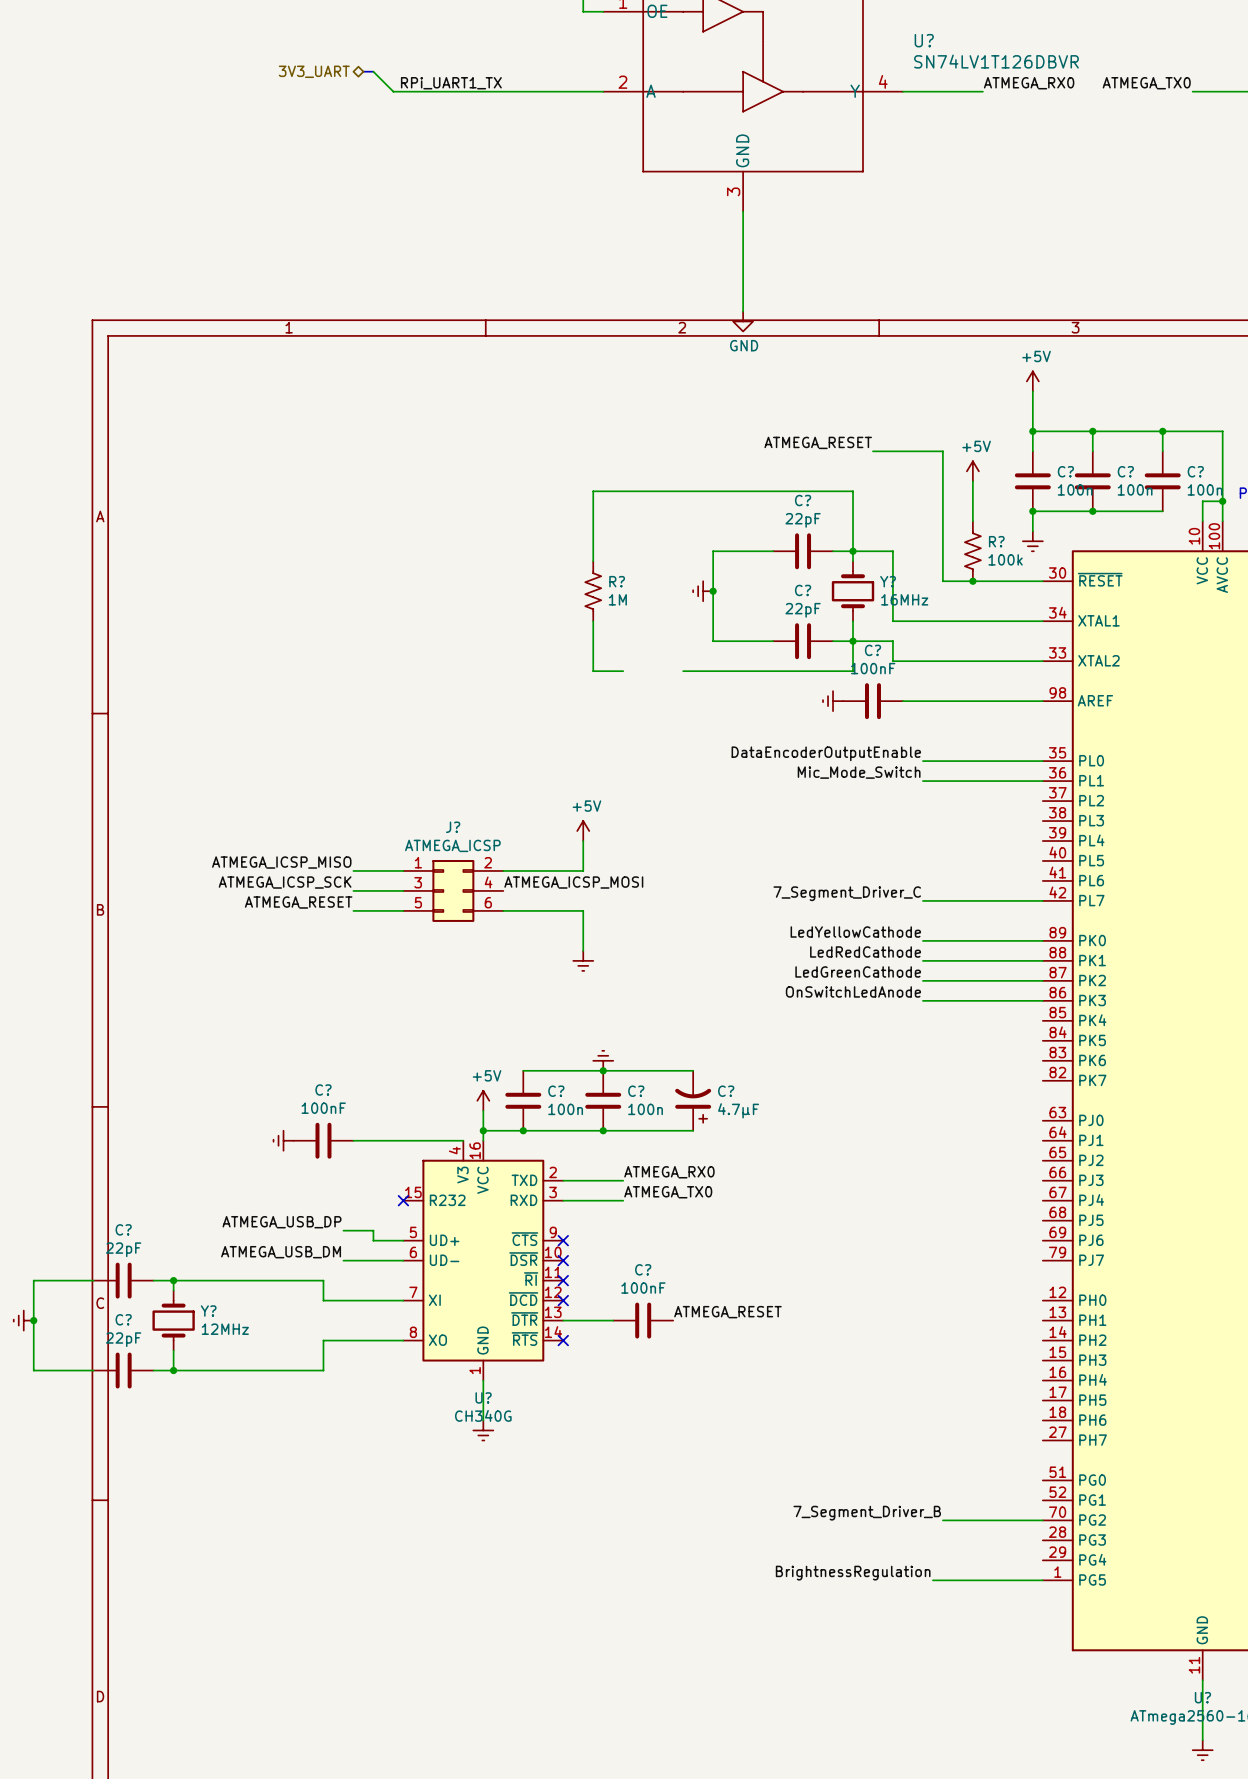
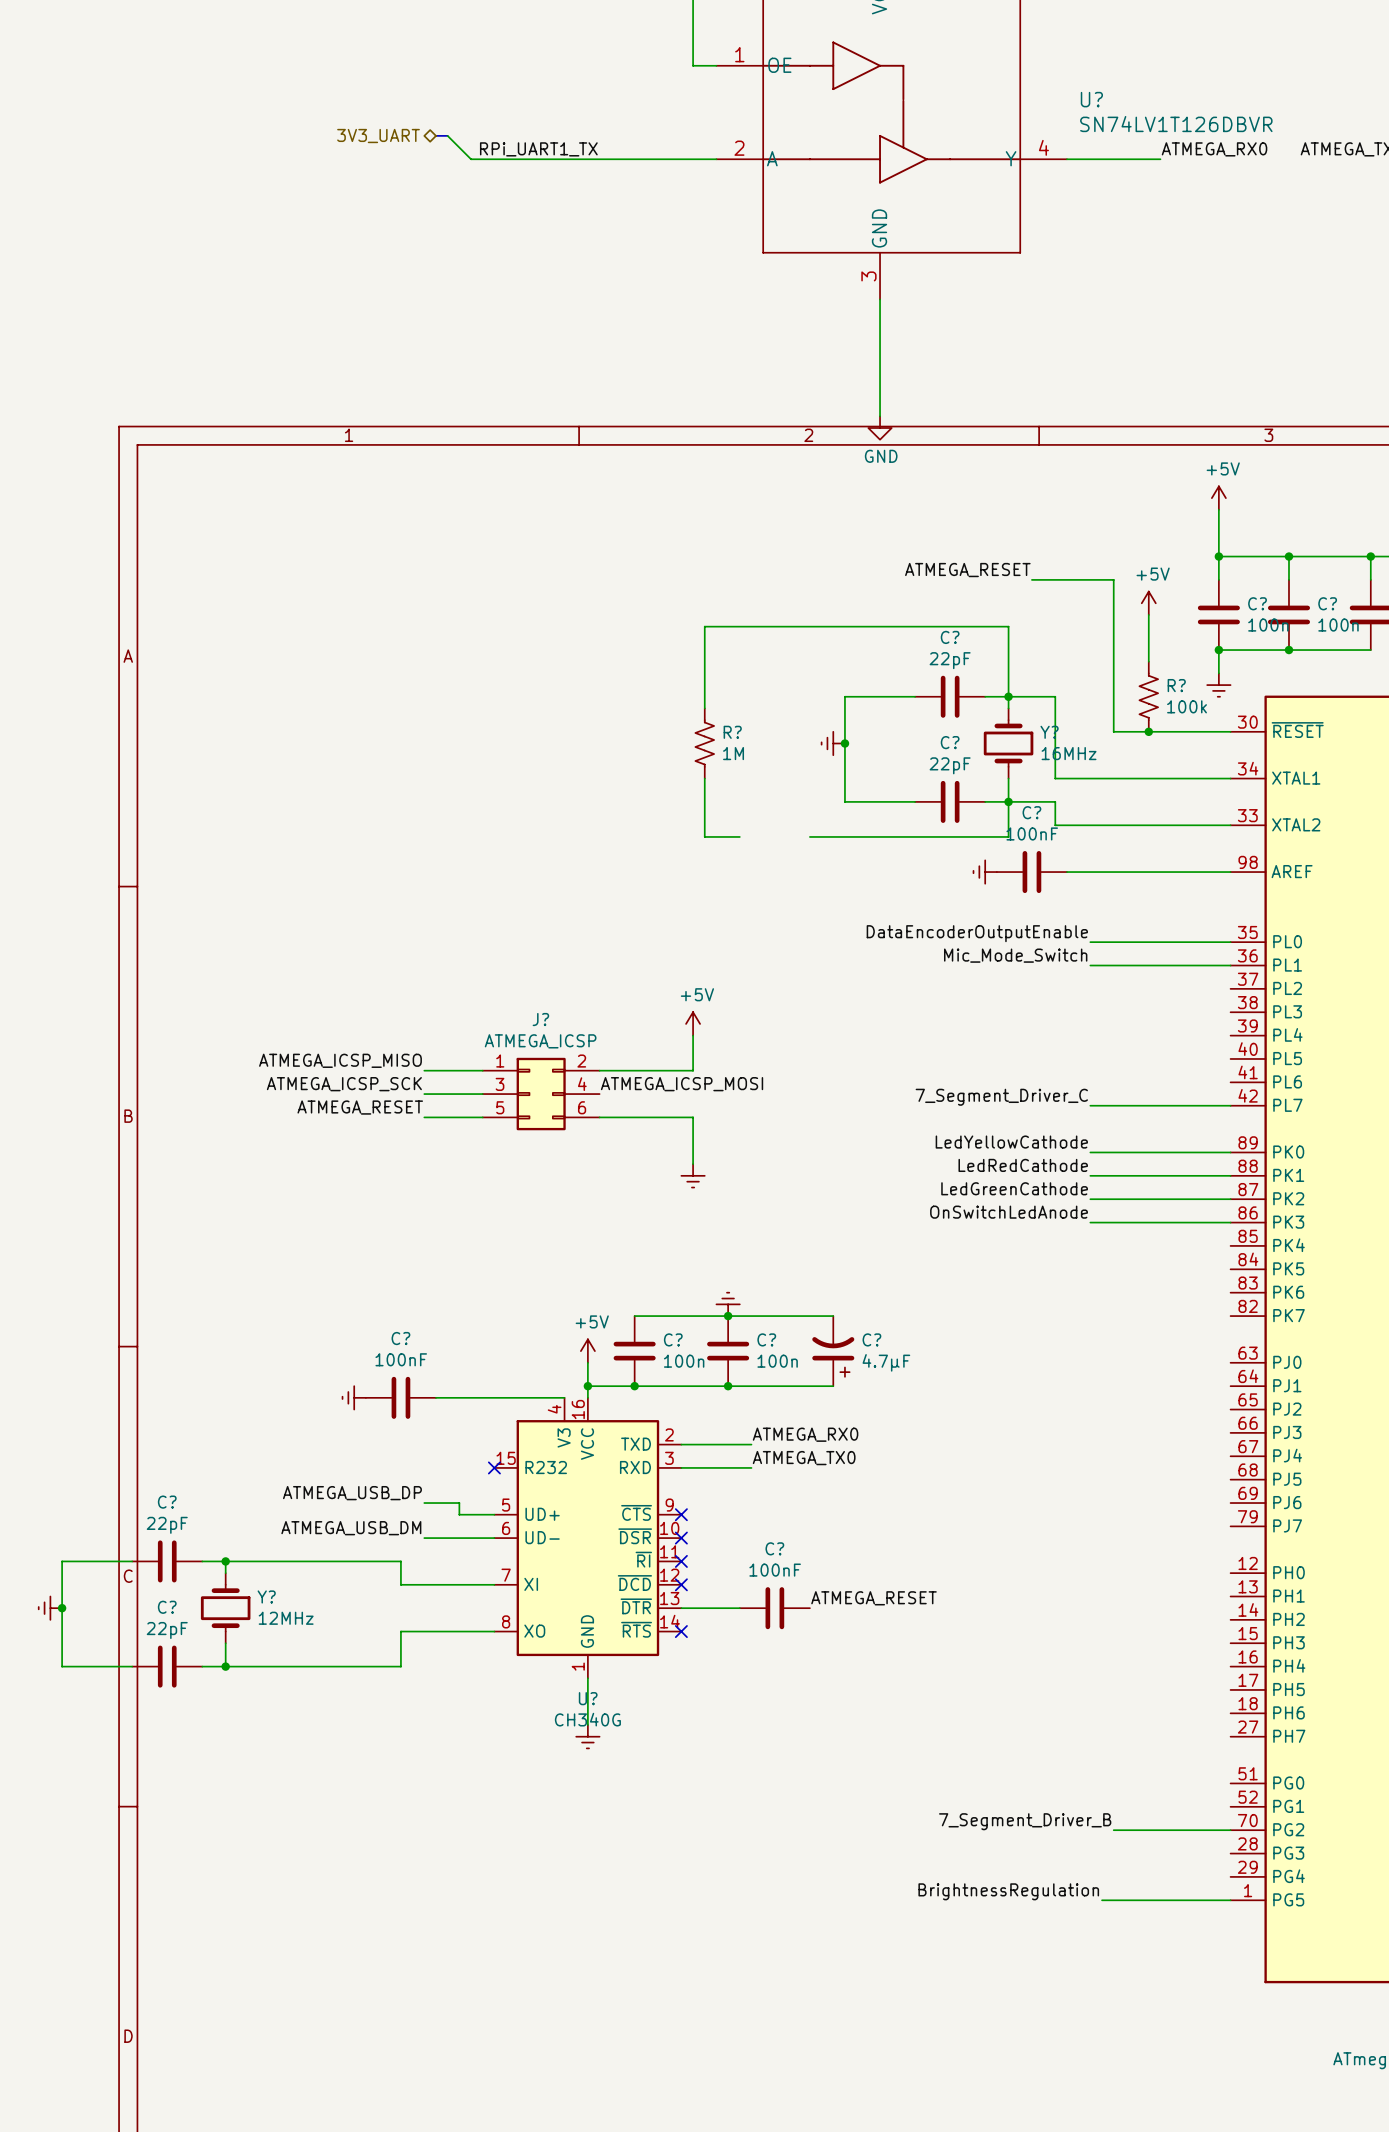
power symbol position: (603, 1060) -> (728, 1304)
wire: (523, 1070) (693, 1070) -> (634, 1316) (833, 1316)
junction position: (603, 1070) -> (728, 1316)
power symbol position: +5V (483, 1100) -> +5V (587, 1351)
C? position: (523, 1100) -> (634, 1351)
C? position: (603, 1100) -> (728, 1351)
C? position: (693, 1100) -> (833, 1351)
wire: (483, 1110) (483, 1140) -> (587, 1362) (587, 1397)
wire: (483, 1130) (693, 1130) -> (587, 1386) (833, 1386)
junction position: (483, 1130) -> (587, 1386)
junction position: (523, 1130) -> (634, 1386)
junction position: (603, 1130) -> (728, 1386)
power symbol position: (283, 1140) -> (354, 1397)
C? position: (323, 1140) -> (400, 1397)
wire: (353, 1140) (463, 1140) -> (436, 1397) (564, 1397)
label position: ATMEGA_RX0 (669, 1172) -> ATMEGA_RX0 (805, 1434)
wire: (563, 1180) (623, 1180) -> (681, 1444) (751, 1444)
label position: ATMEGA_TX0 (668, 1192) -> ATMEGA_TX0 (804, 1458)
no-connect mark position: (403, 1200) -> (494, 1467)
wire: (563, 1200) (623, 1200) -> (681, 1467) (751, 1467)
label position: ATMEGA_USB_DP (282, 1222) -> ATMEGA_USB_DP (352, 1493)
wire: (343, 1230) (373, 1230) (373, 1240) -> (424, 1503) (447, 1503)
wire: (383, 1240) (403, 1240) -> (459, 1503) (459, 1514) (494, 1514)
no-connect mark: (563, 1240) -> none
no-connect mark: none -> (681, 1514)
label position: ATMEGA_USB_DM (281, 1252) -> ATMEGA_USB_DM (351, 1528)
wire: (343, 1260) (403, 1260) -> (424, 1538) (494, 1538)
U? position: (483, 1260) -> (587, 1538)
no-connect mark: (563, 1260) -> none
no-connect mark: none -> (681, 1538)
wire: (93, 1280) (33, 1280) (33, 1370) (93, 1370) -> (132, 1561) (62, 1561) (62, 1666) (132, 1666)
C? position: (123, 1280) -> (167, 1561)
wire: (153, 1280) (323, 1280) (323, 1300) (403, 1300) -> (202, 1561) (400, 1561) (400, 1584) (494, 1584)
wire: (173, 1280) (173, 1290) -> (225, 1561) (225, 1573)
junction position: (173, 1280) -> (225, 1561)
no-connect mark: (563, 1280) -> none
no-connect mark: none -> (681, 1561)
no-connect mark: (563, 1300) -> none
no-connect mark: none -> (681, 1584)
label position: ATMEGA_RESET (727, 1312) -> ATMEGA_RESET (873, 1598)
power symbol position: (23, 1320) -> (50, 1608)
junction position: (33, 1320) -> (62, 1608)
Y? position: (173, 1320) -> (225, 1608)
wire: (563, 1320) (613, 1320) -> (681, 1608) (739, 1608)
C? position: (643, 1320) -> (774, 1608)
wire: (403, 1340) (323, 1340) (323, 1370) (153, 1370) -> (494, 1631) (400, 1631) (400, 1666) (202, 1666)
no-connect mark position: (563, 1340) -> (681, 1631)
wire: (173, 1350) (173, 1370) -> (225, 1643) (225, 1666)
C? position: (123, 1370) -> (167, 1666)
junction position: (173, 1370) -> (225, 1666)
wire: (483, 1380) (483, 1420) -> (587, 1678) (587, 1725)
power symbol position: (483, 1430) -> (587, 1736)

